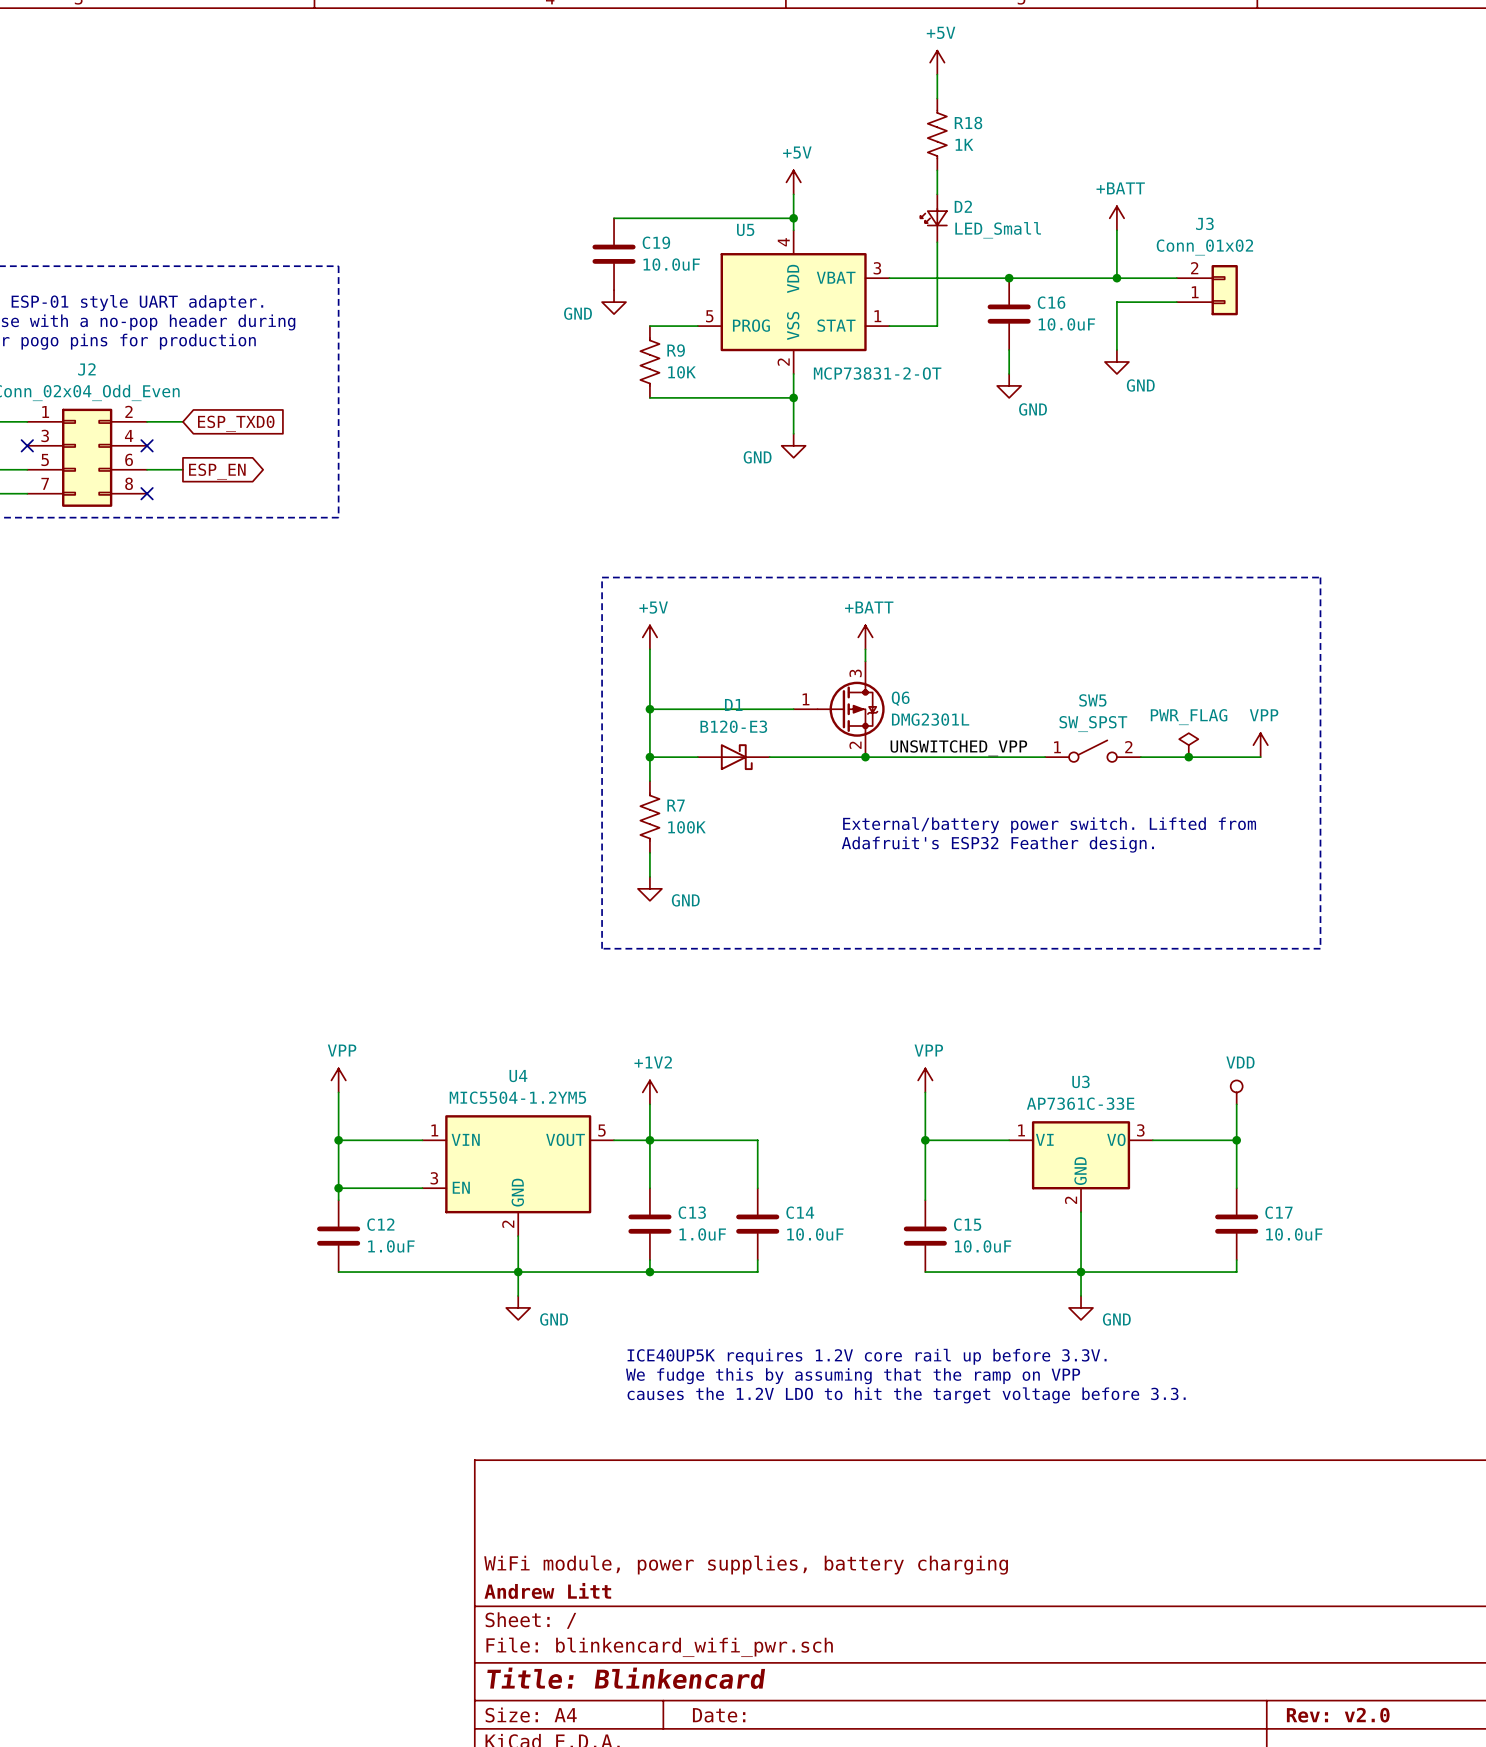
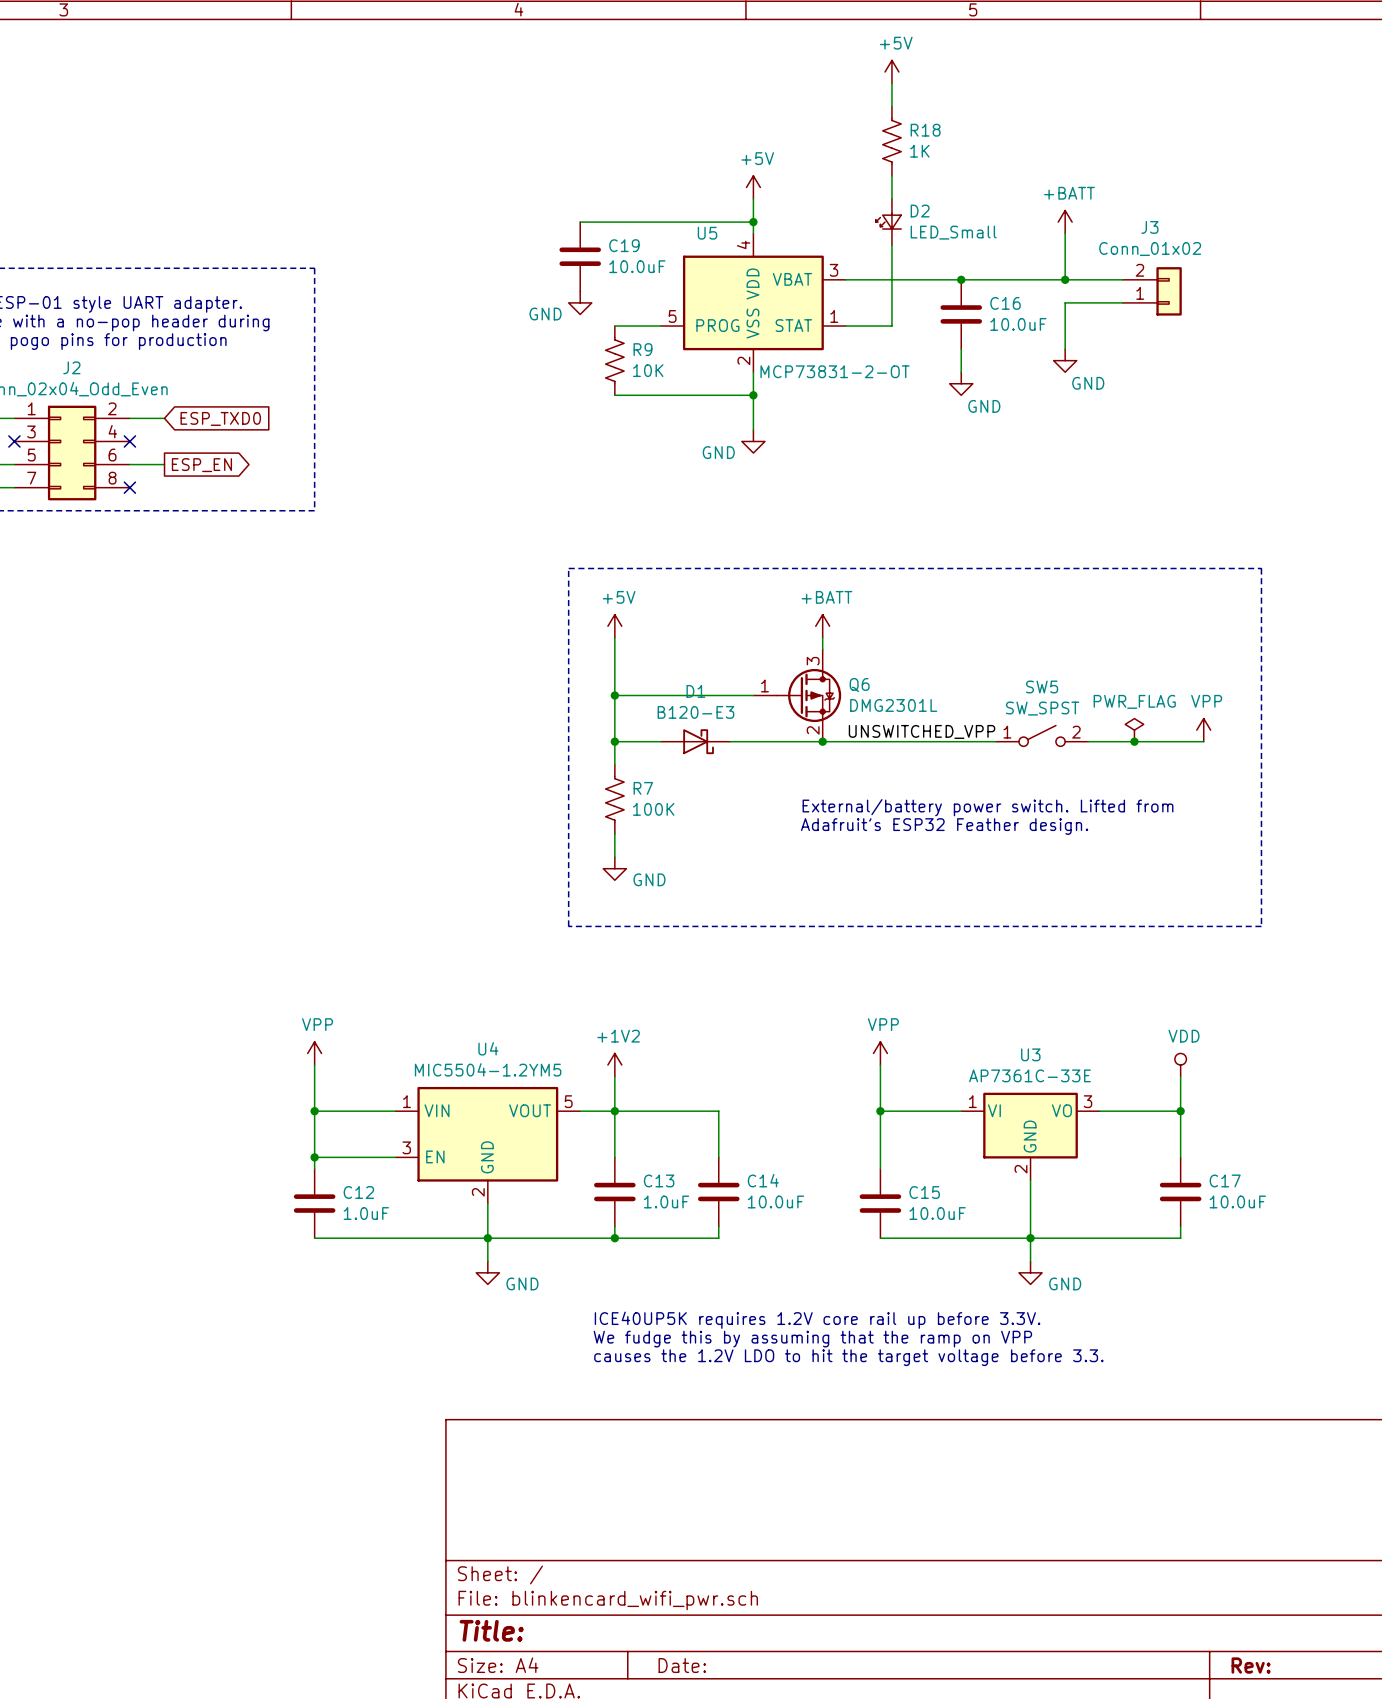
title block: WiFi module, power supplies, battery charging (746, 1565) -> none
title block: Andrew Litt (547, 1590) -> none
title block: Title: Blinkencard (626, 1678) -> Title: (491, 1630)
title block: Rev: v2.0 (1338, 1715) -> Rev: (1251, 1665)

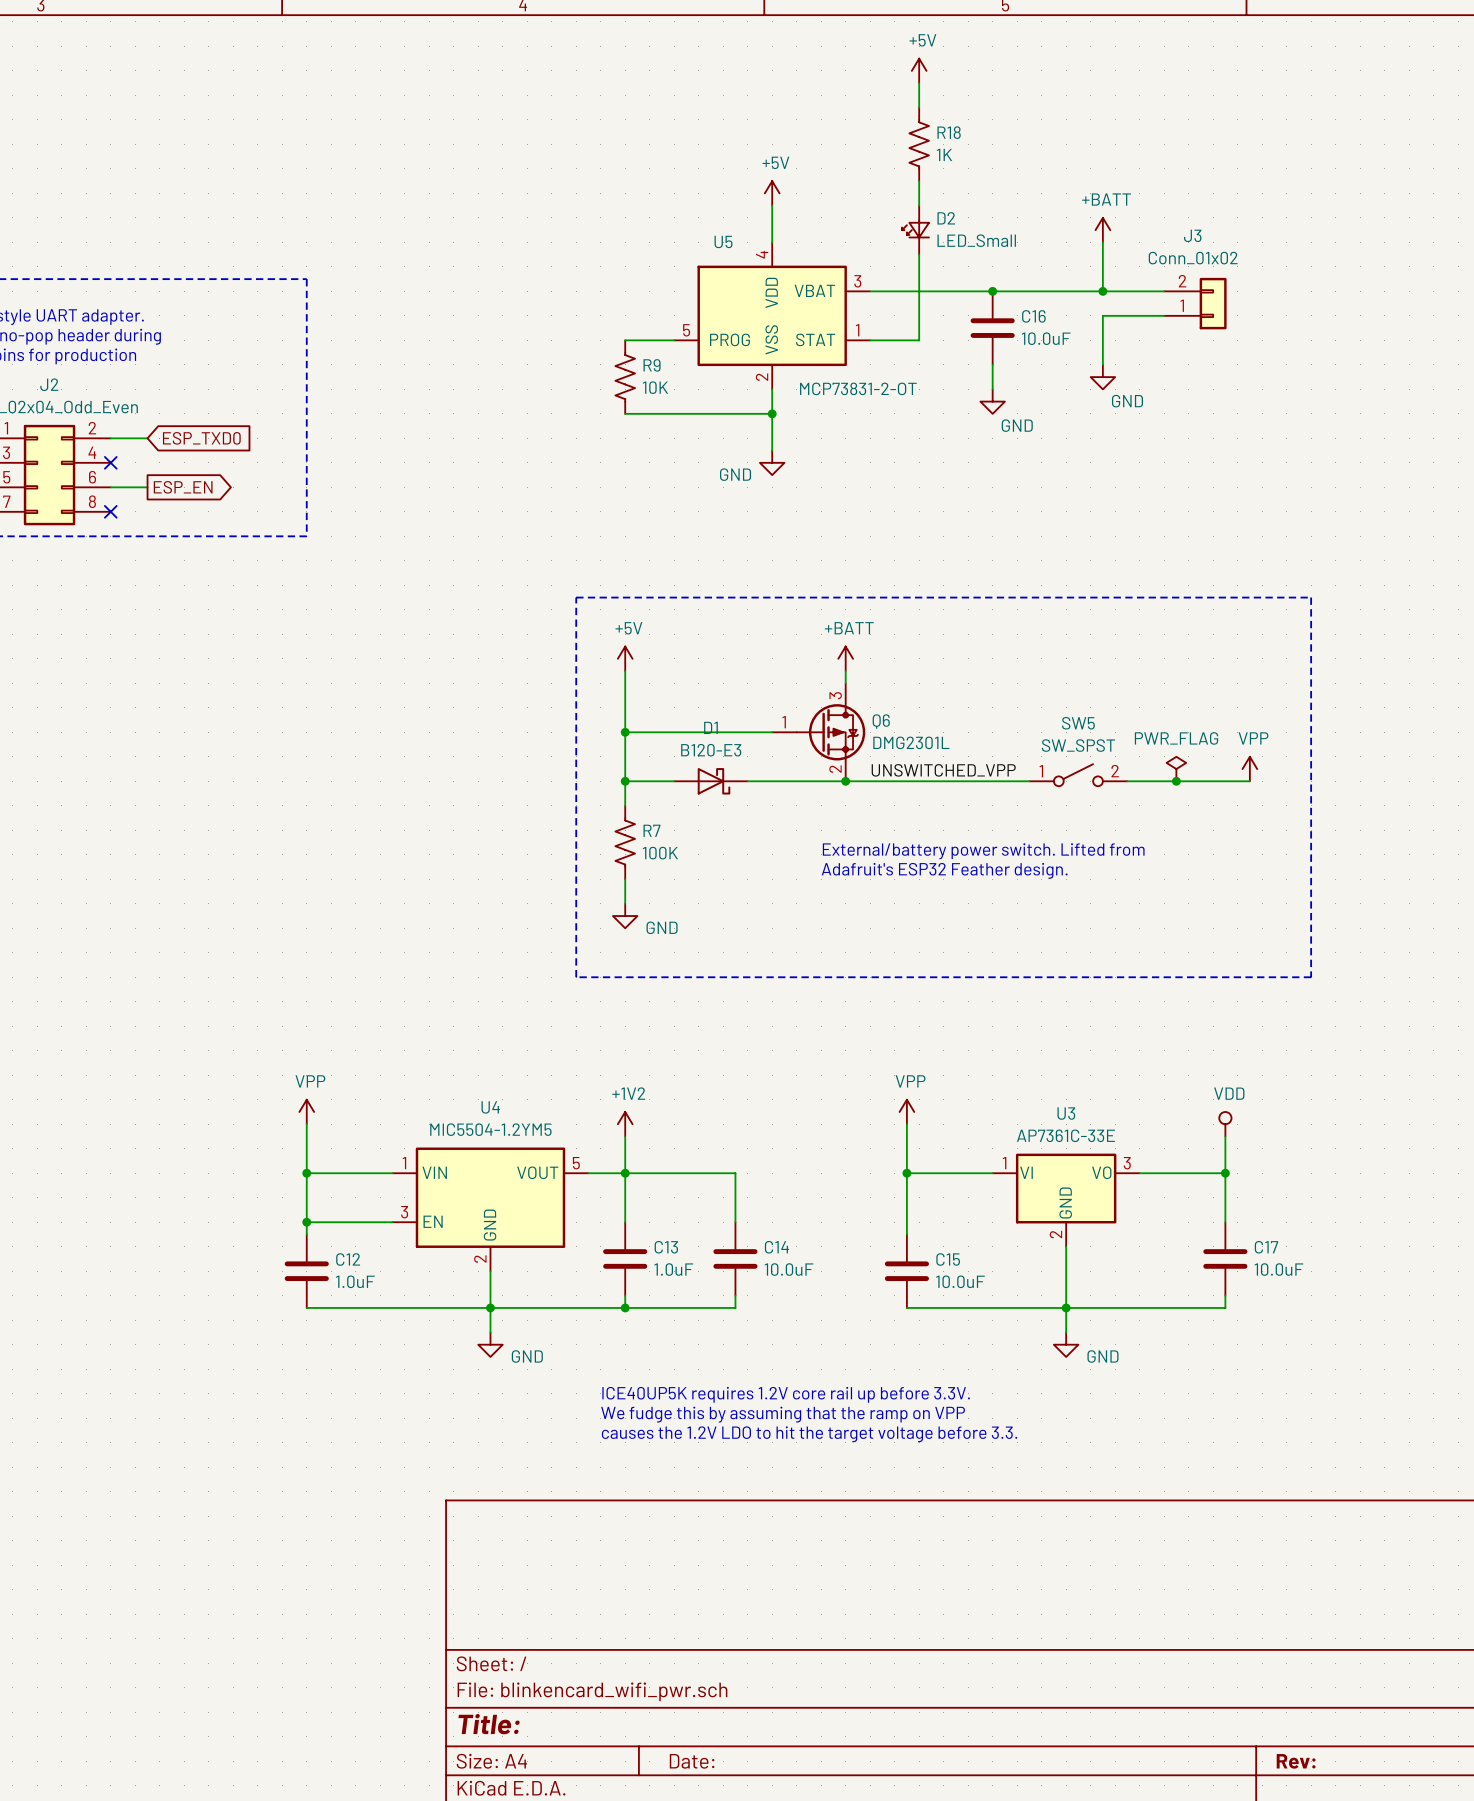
wire: (580, 222) (753, 222) -> none
junction: (753, 222) -> none
C19: 10.0uF (580, 256) -> none
power symbol: GND (580, 302) -> none

